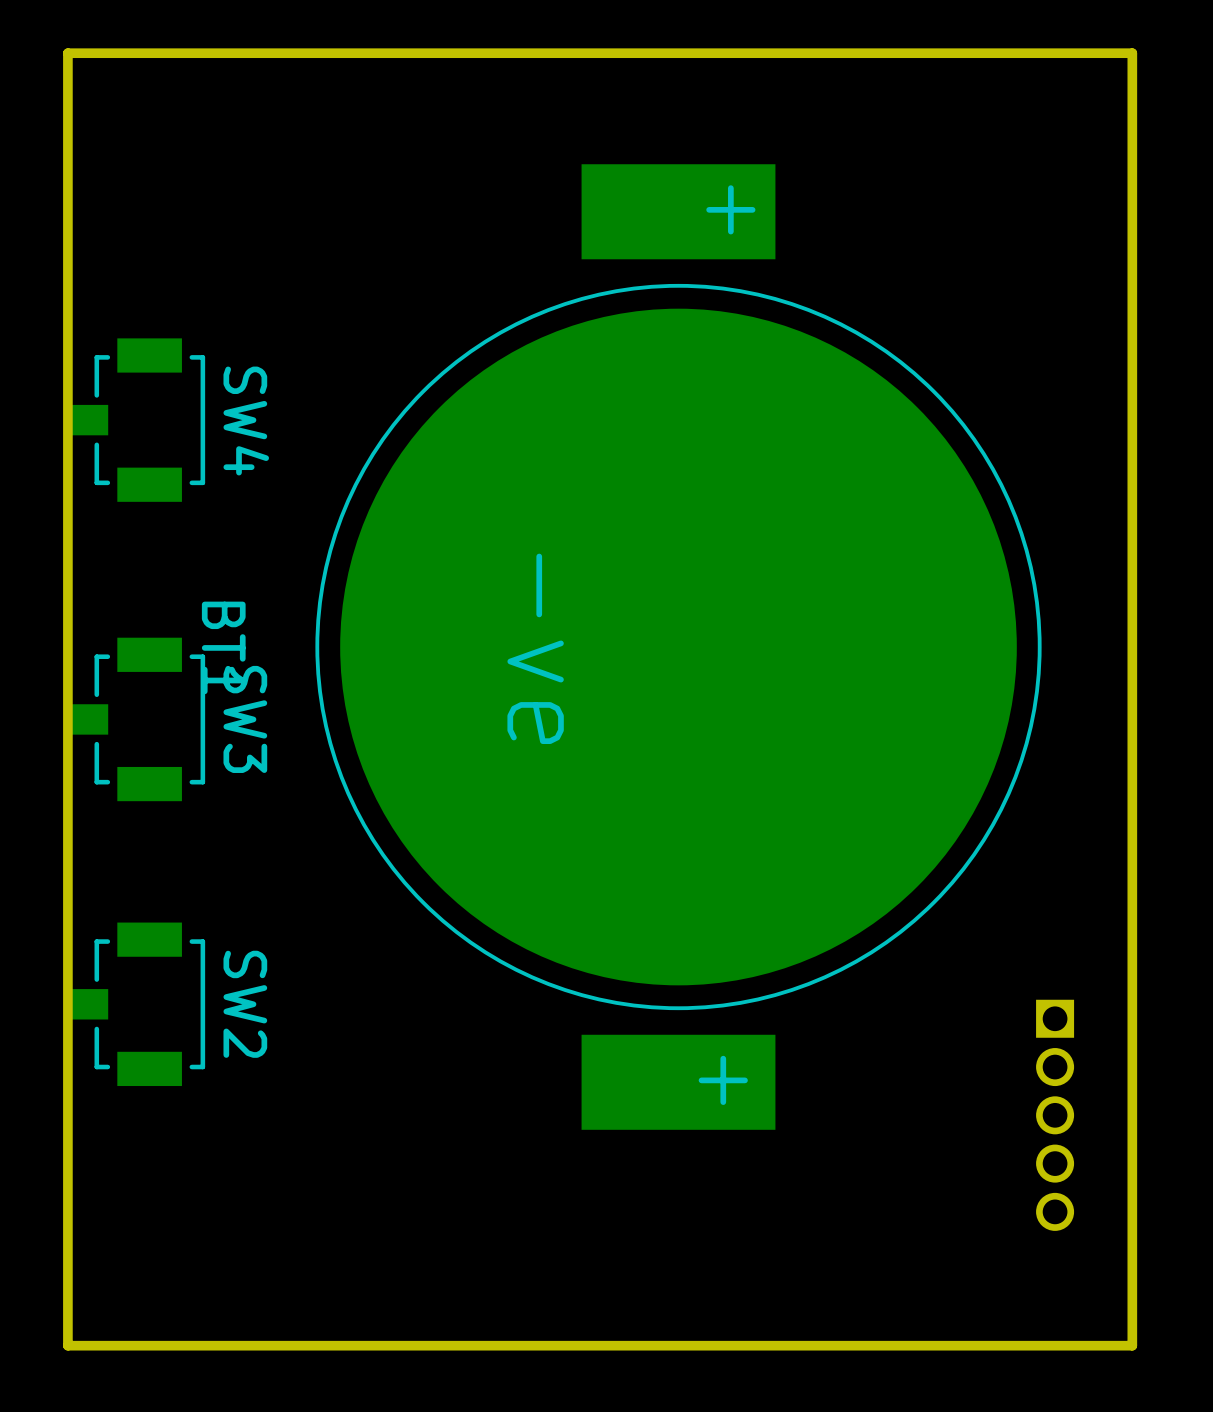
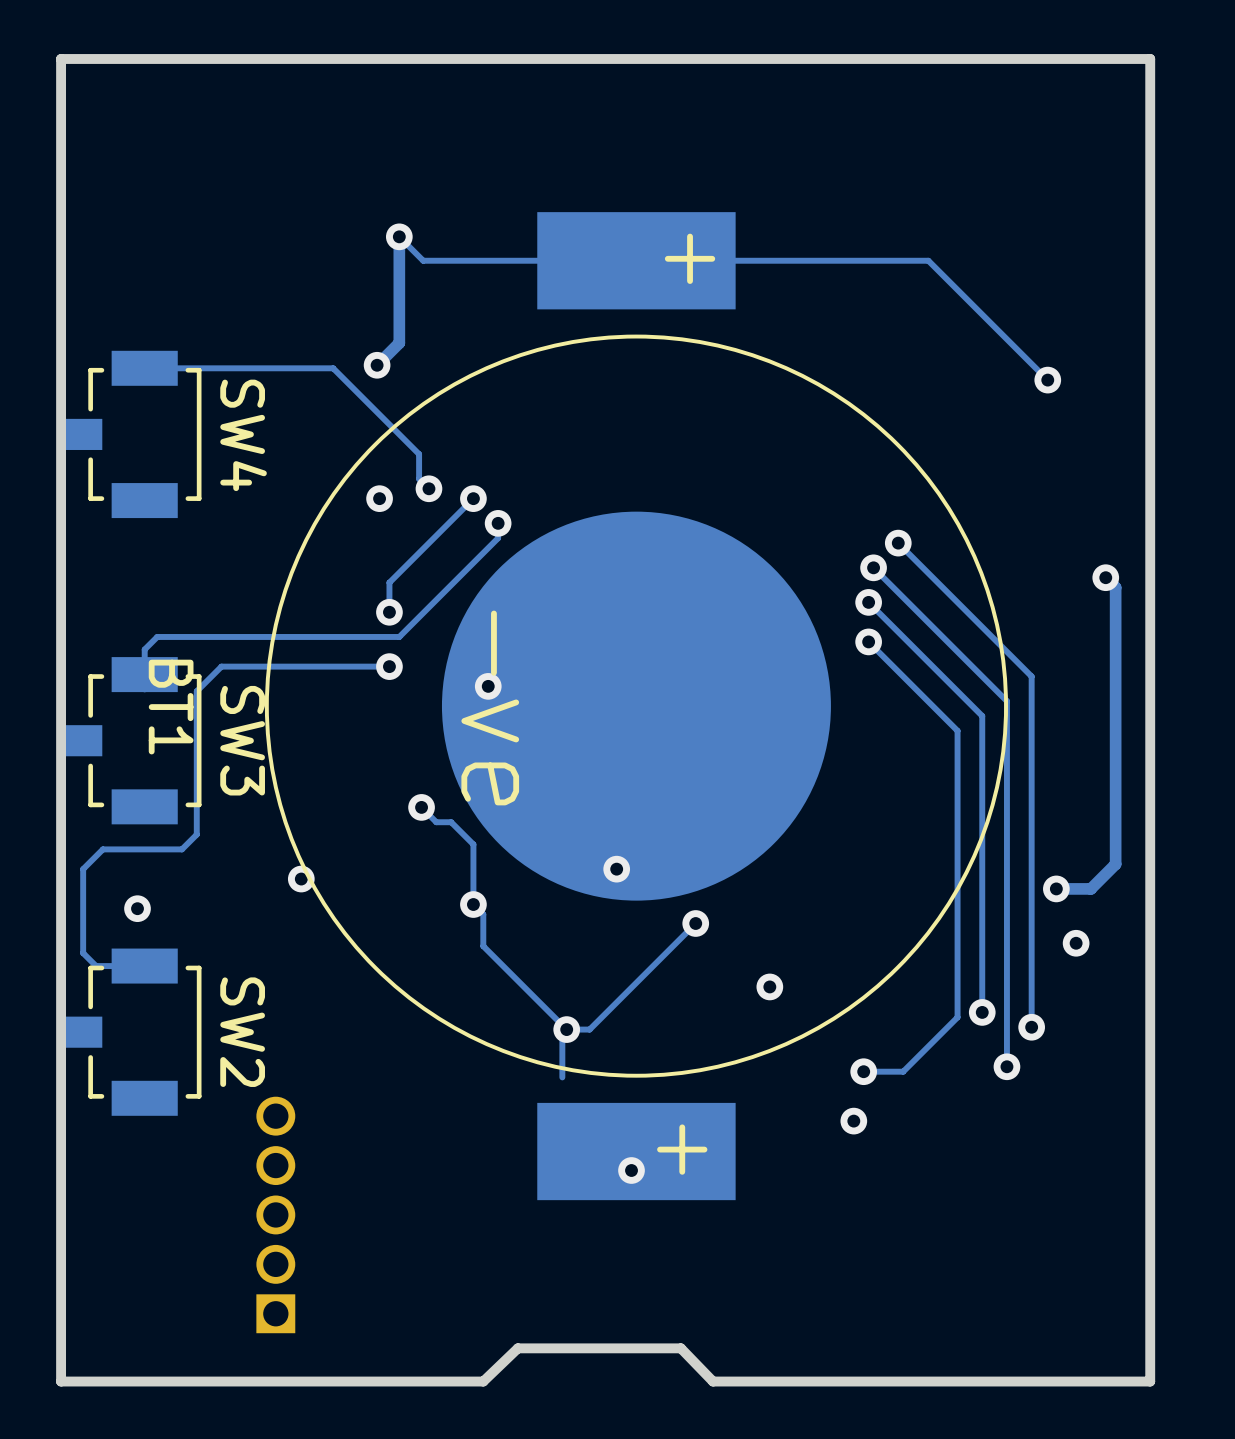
BT1 footprint: [315, 164, 1042, 1130] -> [264, 212, 1008, 1201]
via: none -> (399, 236)
track: none -> (377, 365) (399, 343) (399, 236) (423, 260) (928, 260) (1047, 380)
via: none -> (377, 365)
track: none -> (144, 368) (333, 368) (419, 454) (419, 478) (428, 488)
via: none -> (1047, 380)
via: none -> (428, 488)
via: none -> (379, 498)
track: none -> (473, 498) (389, 582) (389, 612)
via: none -> (473, 498)
track: none -> (498, 523) (498, 538) (399, 636) (157, 636) (144, 649) (144, 689)
via: none -> (498, 523)
track: none -> (898, 543) (1031, 676) (1031, 1027)
via: none -> (898, 543)
track: none -> (873, 567) (1006, 701) (1006, 1066)
via: none -> (873, 567)
track: none -> (1105, 577) (1115, 587) (1115, 864) (1090, 888) (1056, 888)
via: none -> (1105, 577)
track: none -> (868, 602) (982, 716) (982, 1012)
via: none -> (868, 602)
via: none -> (389, 612)
track: none -> (868, 641) (957, 730) (957, 1017) (903, 1071) (863, 1071)
via: none -> (868, 641)
track: none -> (389, 666) (221, 666) (196, 691) (196, 834) (181, 849) (102, 849) (83, 869) (83, 953) (96, 966) (144, 966)
via: none -> (389, 666)
via: none -> (488, 686)
track: none -> (421, 807) (436, 822) (451, 822) (473, 844) (473, 904) (483, 914) (483, 946) (566, 1029)
via: none -> (421, 807)
via: none -> (616, 869)
via: none -> (301, 879)
via: none -> (1056, 888)
via: none -> (473, 904)
via: none -> (137, 908)
track: none -> (695, 923) (589, 1029) (566, 1029)
via: none -> (695, 923)
via: none -> (1076, 943)
via: none -> (769, 986)
via: none -> (982, 1012)
via: none -> (1031, 1027)
track: none -> (566, 1029) (562, 1033) (562, 1077)
via: none -> (566, 1029)
via: none -> (1006, 1066)
via: none -> (863, 1071)
via: none -> (853, 1121)
part rotation: 0° (1055, 1115) -> 180° (275, 1214)
part position: (1055, 1115) -> (275, 1214)
via: none -> (631, 1170)
board edge: (705, 1345) (480, 1345) -> (713, 1381) (680, 1348) (517, 1348) (483, 1381)

